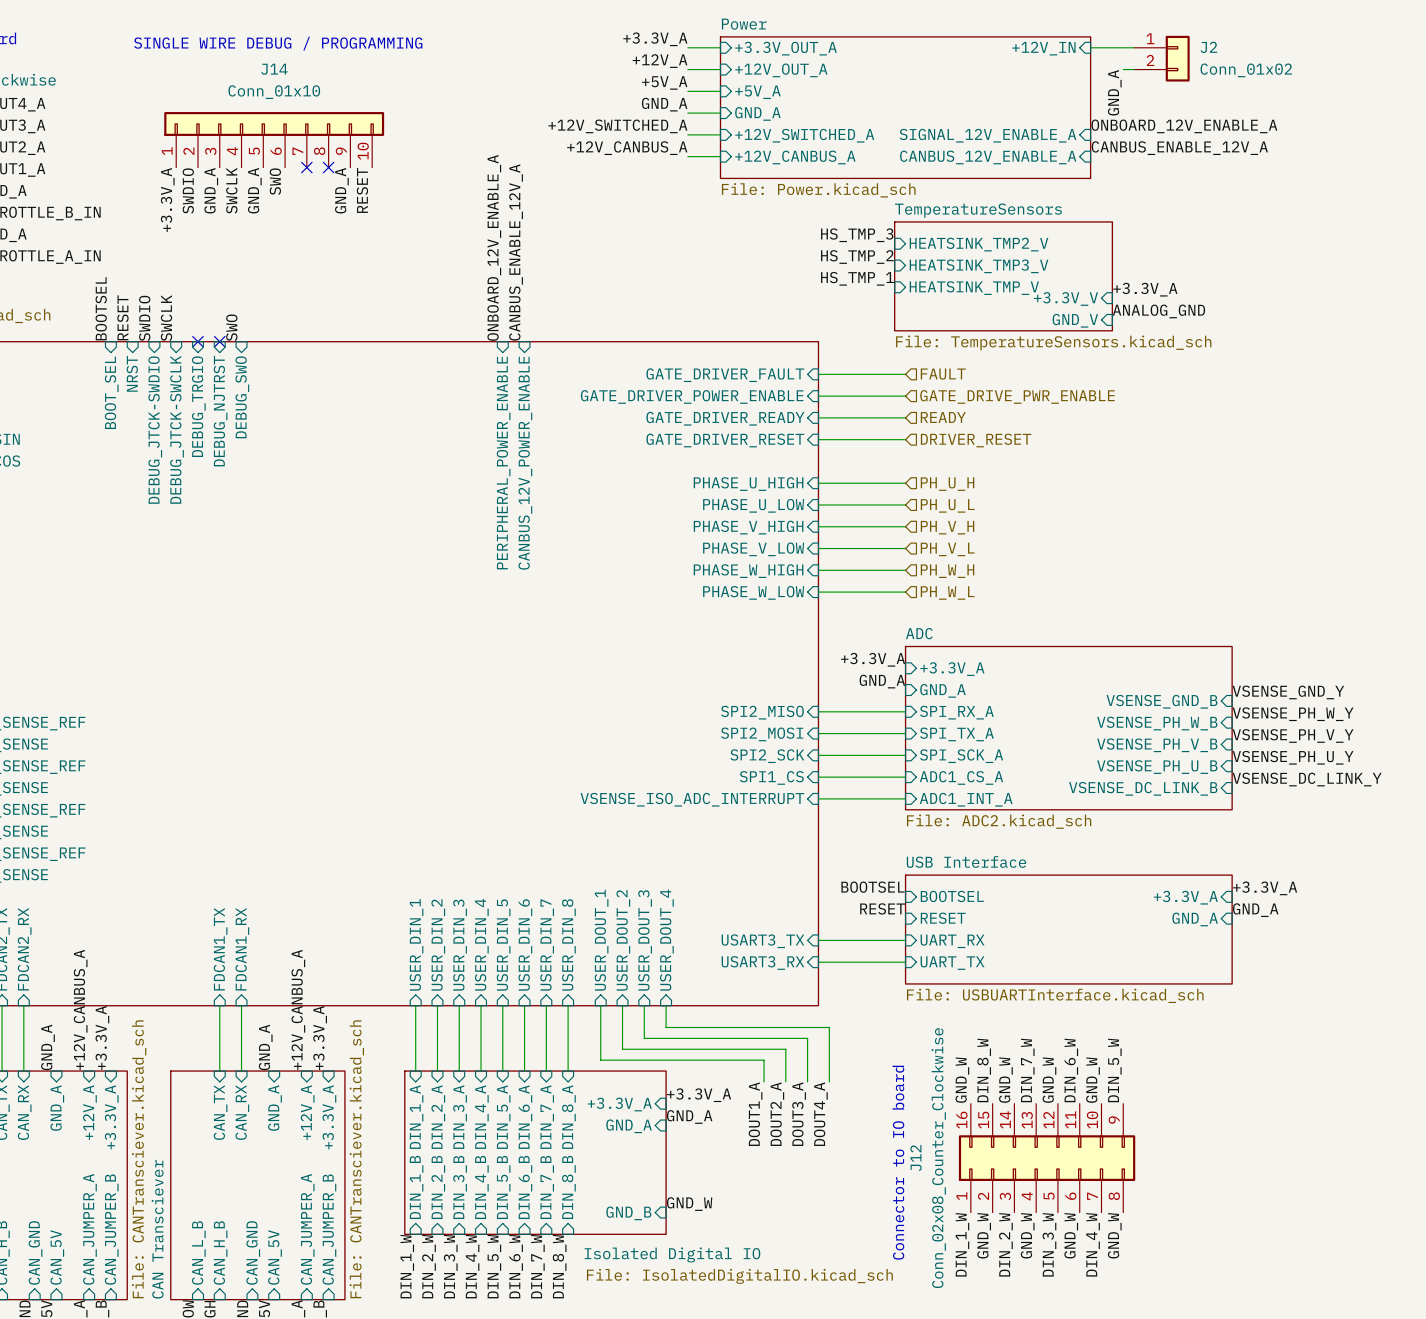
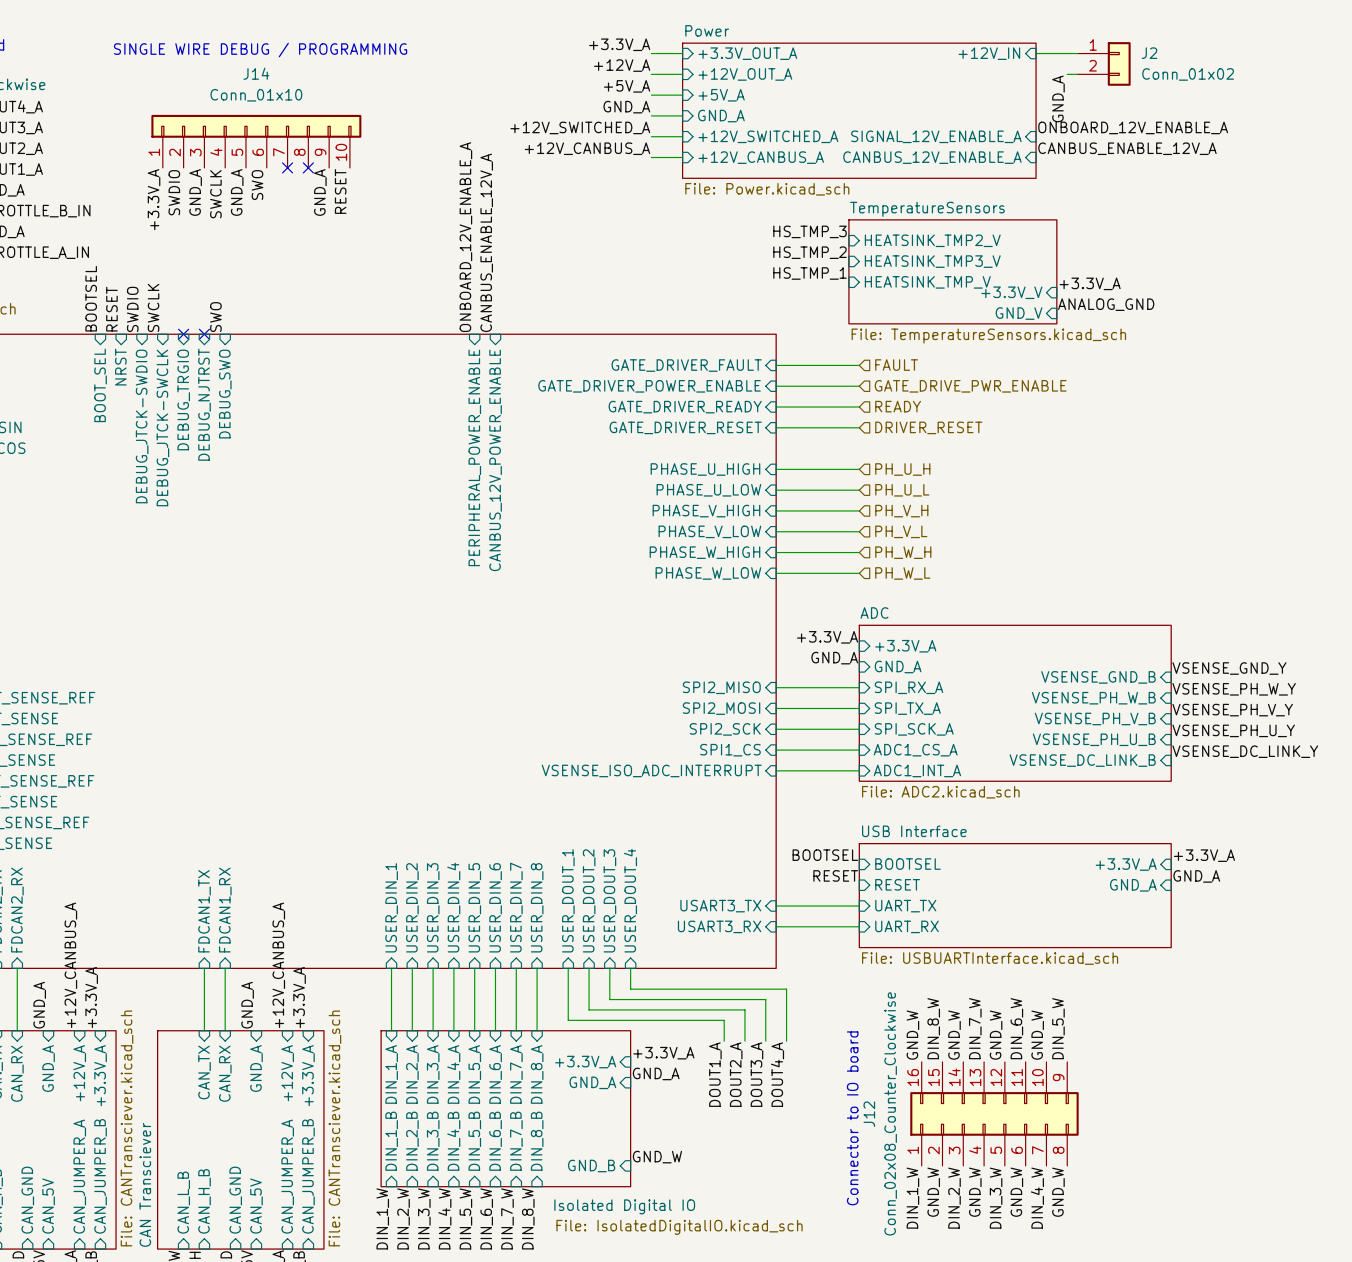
sheet pin: UART_RX (952, 941) -> UART_TX (905, 906)
sheet pin: UART_TX (952, 963) -> UART_RX (907, 926)

